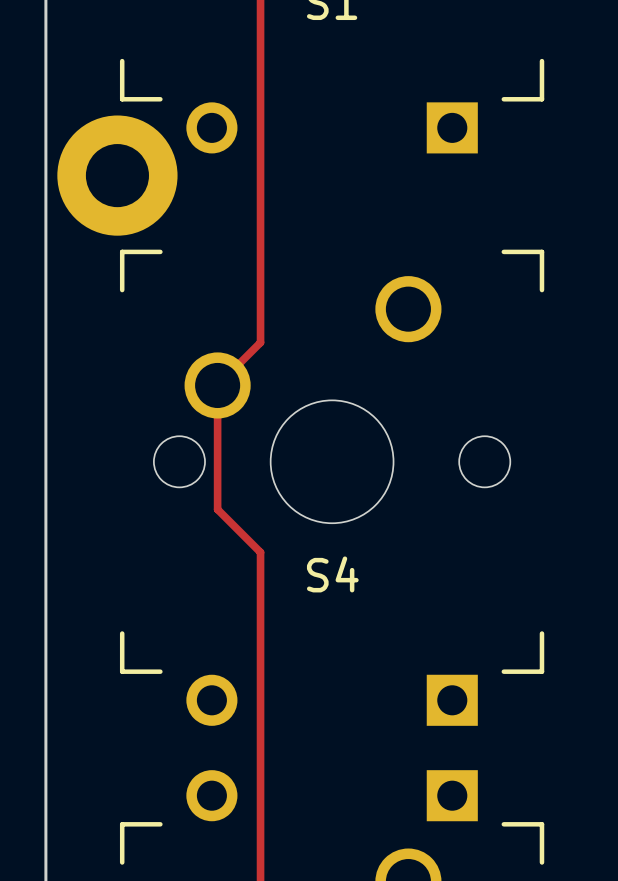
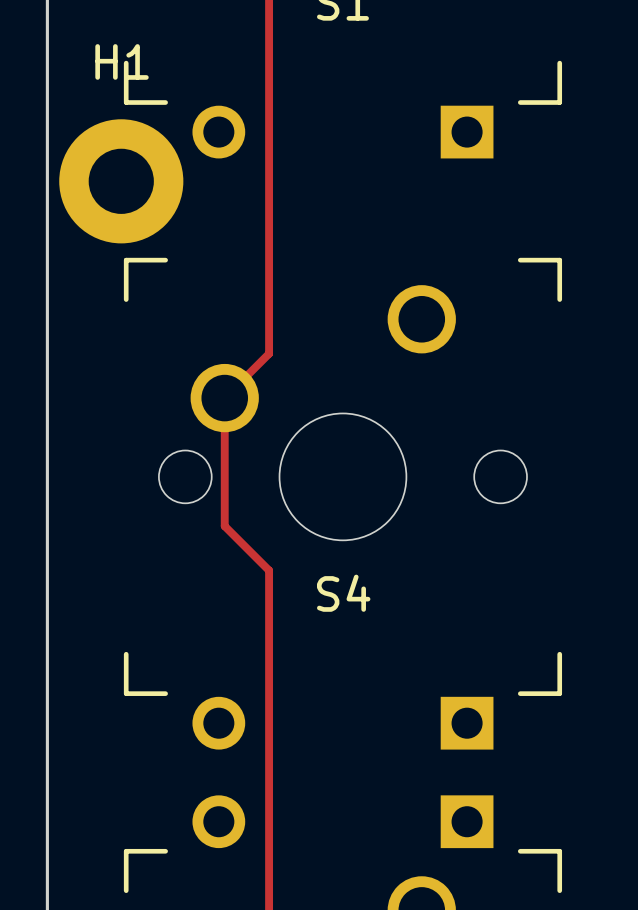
H1 name: none -> H1 (122, 61)

